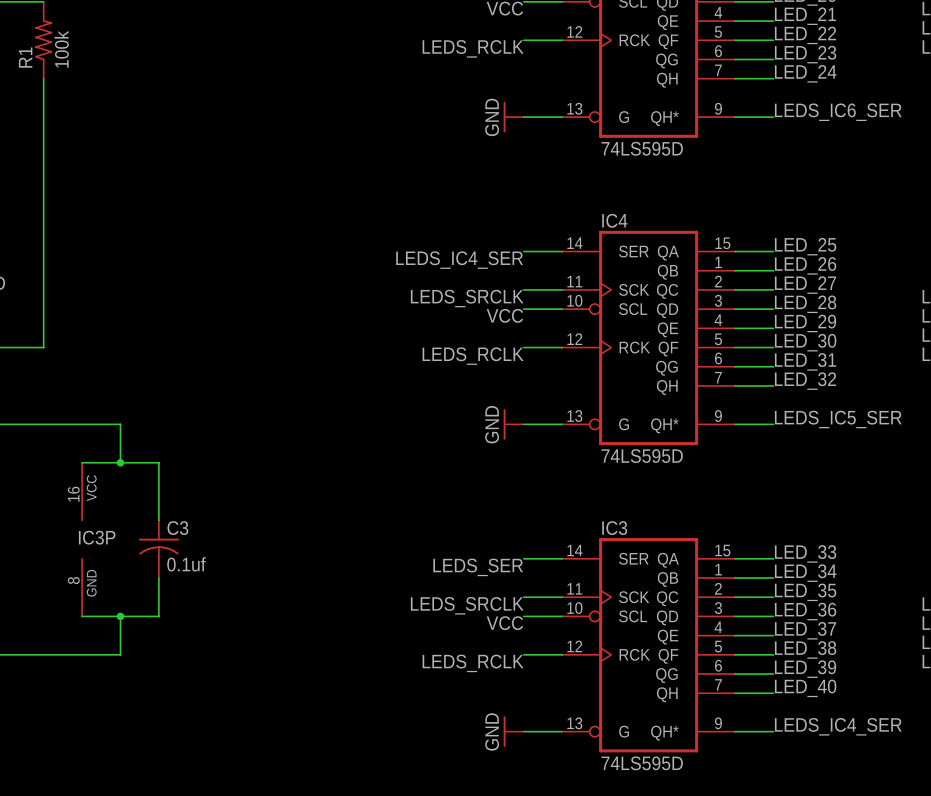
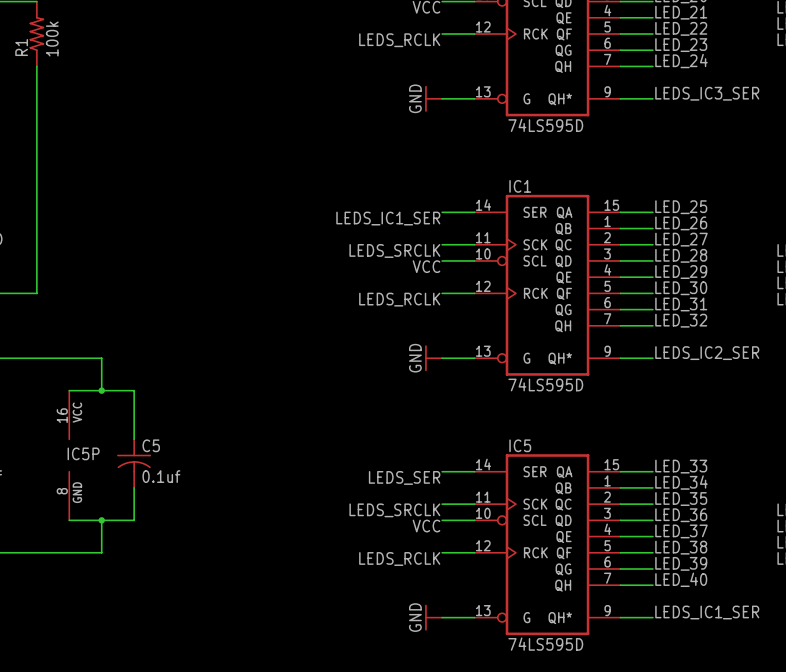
label: LEDS_IC6_SER (838, 112) -> LEDS_IC3_SER (707, 93)
IC4 name: IC4 (614, 220) -> IC1 (520, 186)
label: LEDS_IC4_SER (459, 260) -> LEDS_IC1_SER (388, 218)
label: LEDS_IC5_SER (838, 419) -> LEDS_IC2_SER (707, 353)
C3 name: C3 (177, 528) -> C5 (151, 445)
IC3 name: IC3 (614, 528) -> IC5 (520, 445)
IC3P name: IC3P (97, 537) -> IC5P (83, 453)
label: LEDS_IC4_SER (838, 726) -> LEDS_IC1_SER (707, 612)

